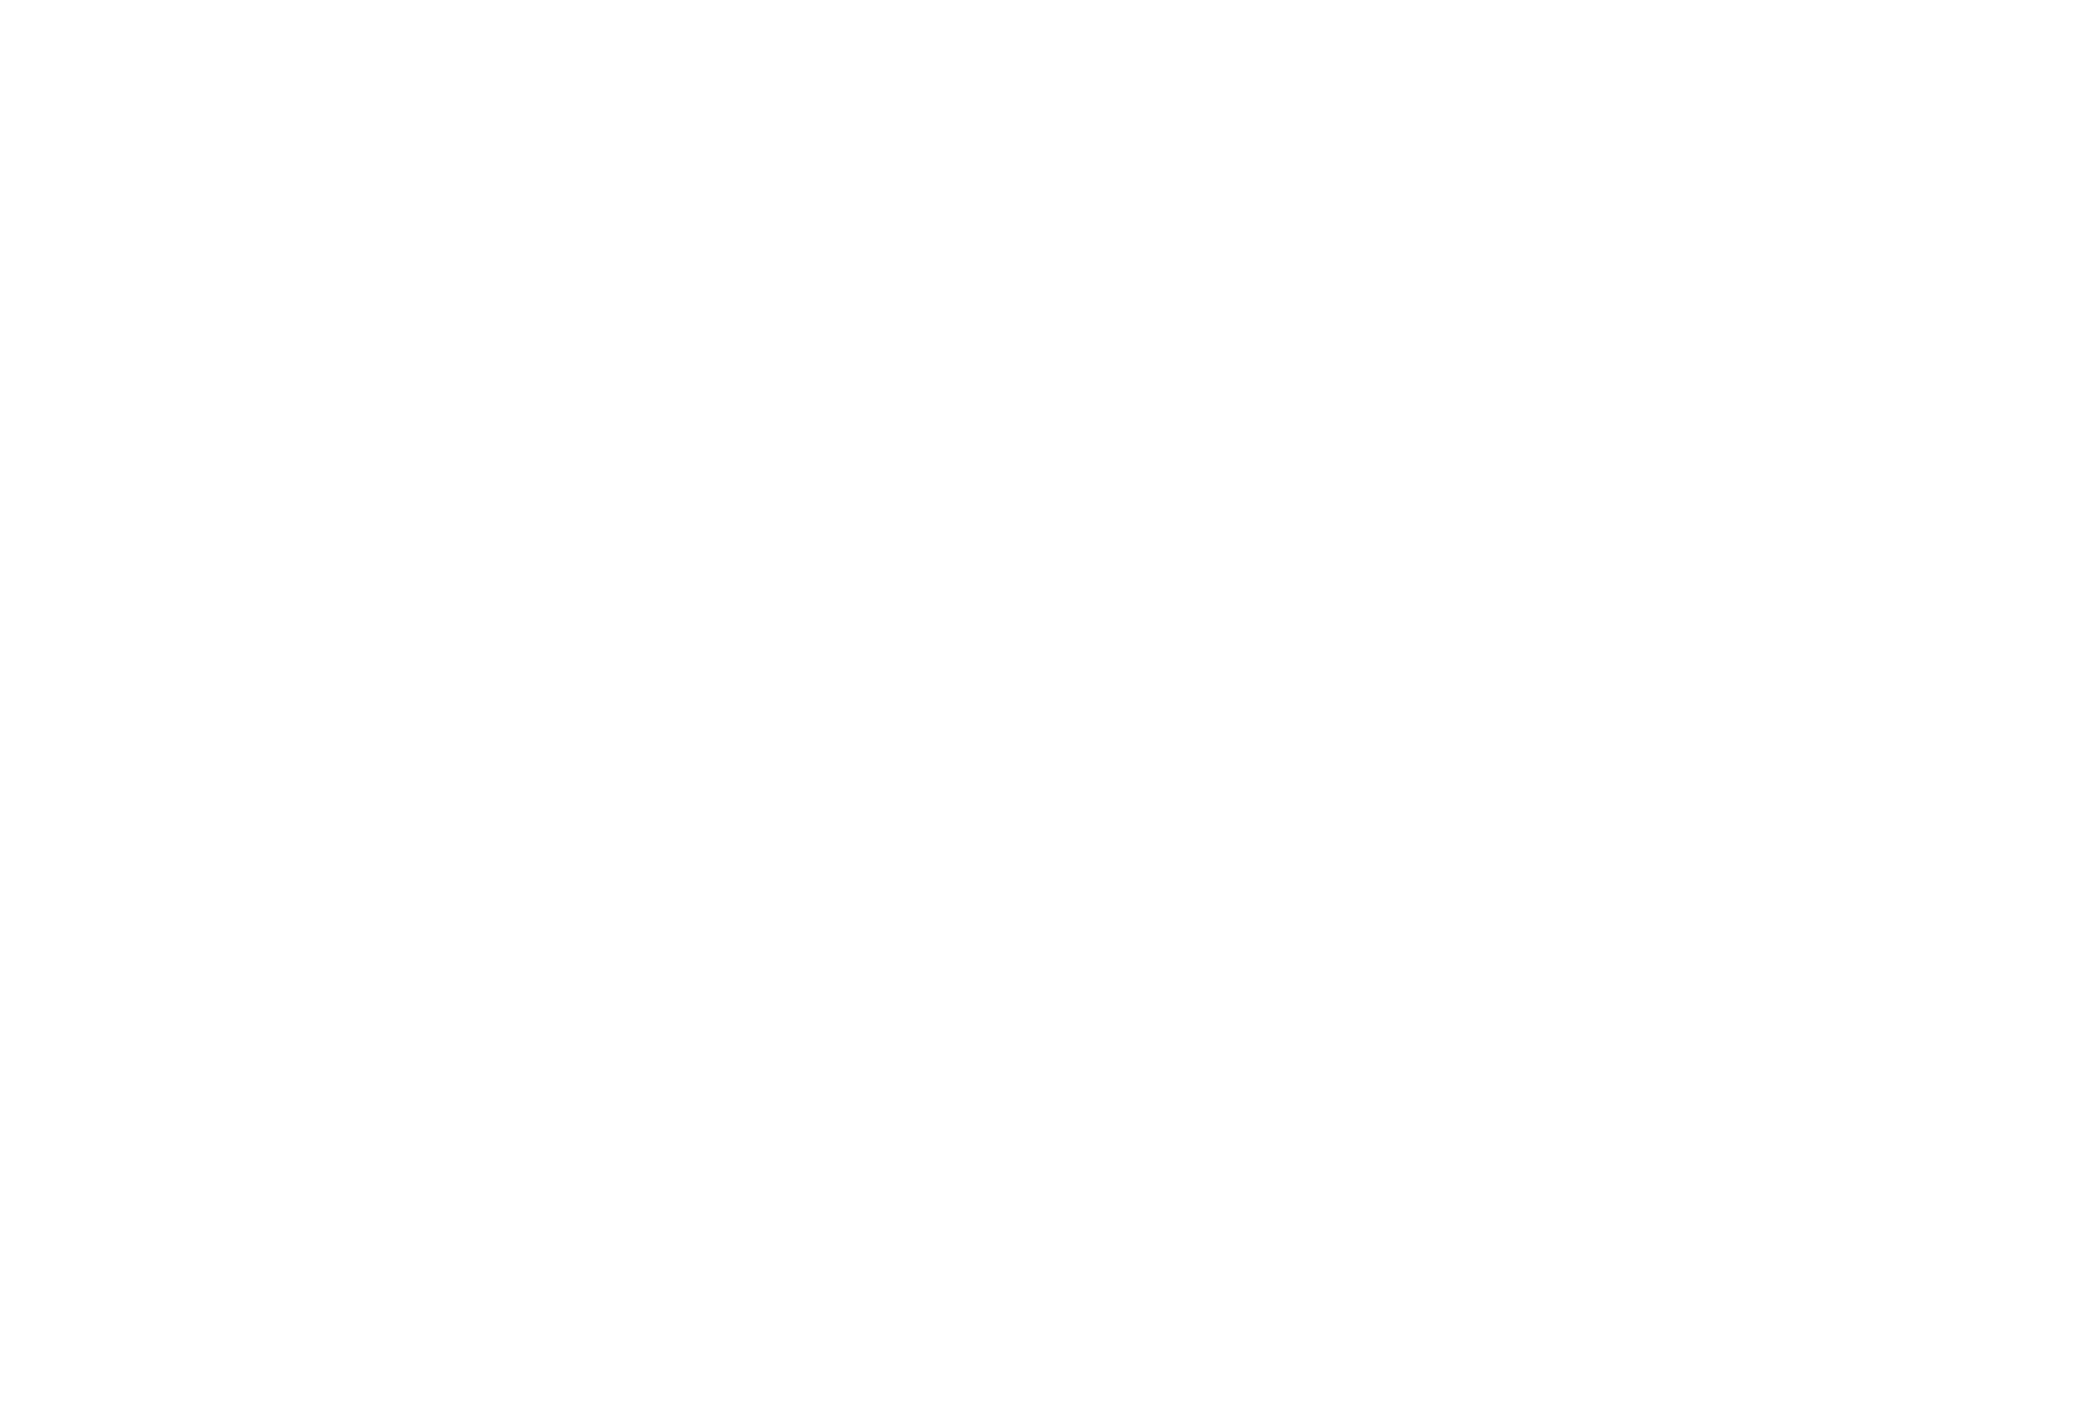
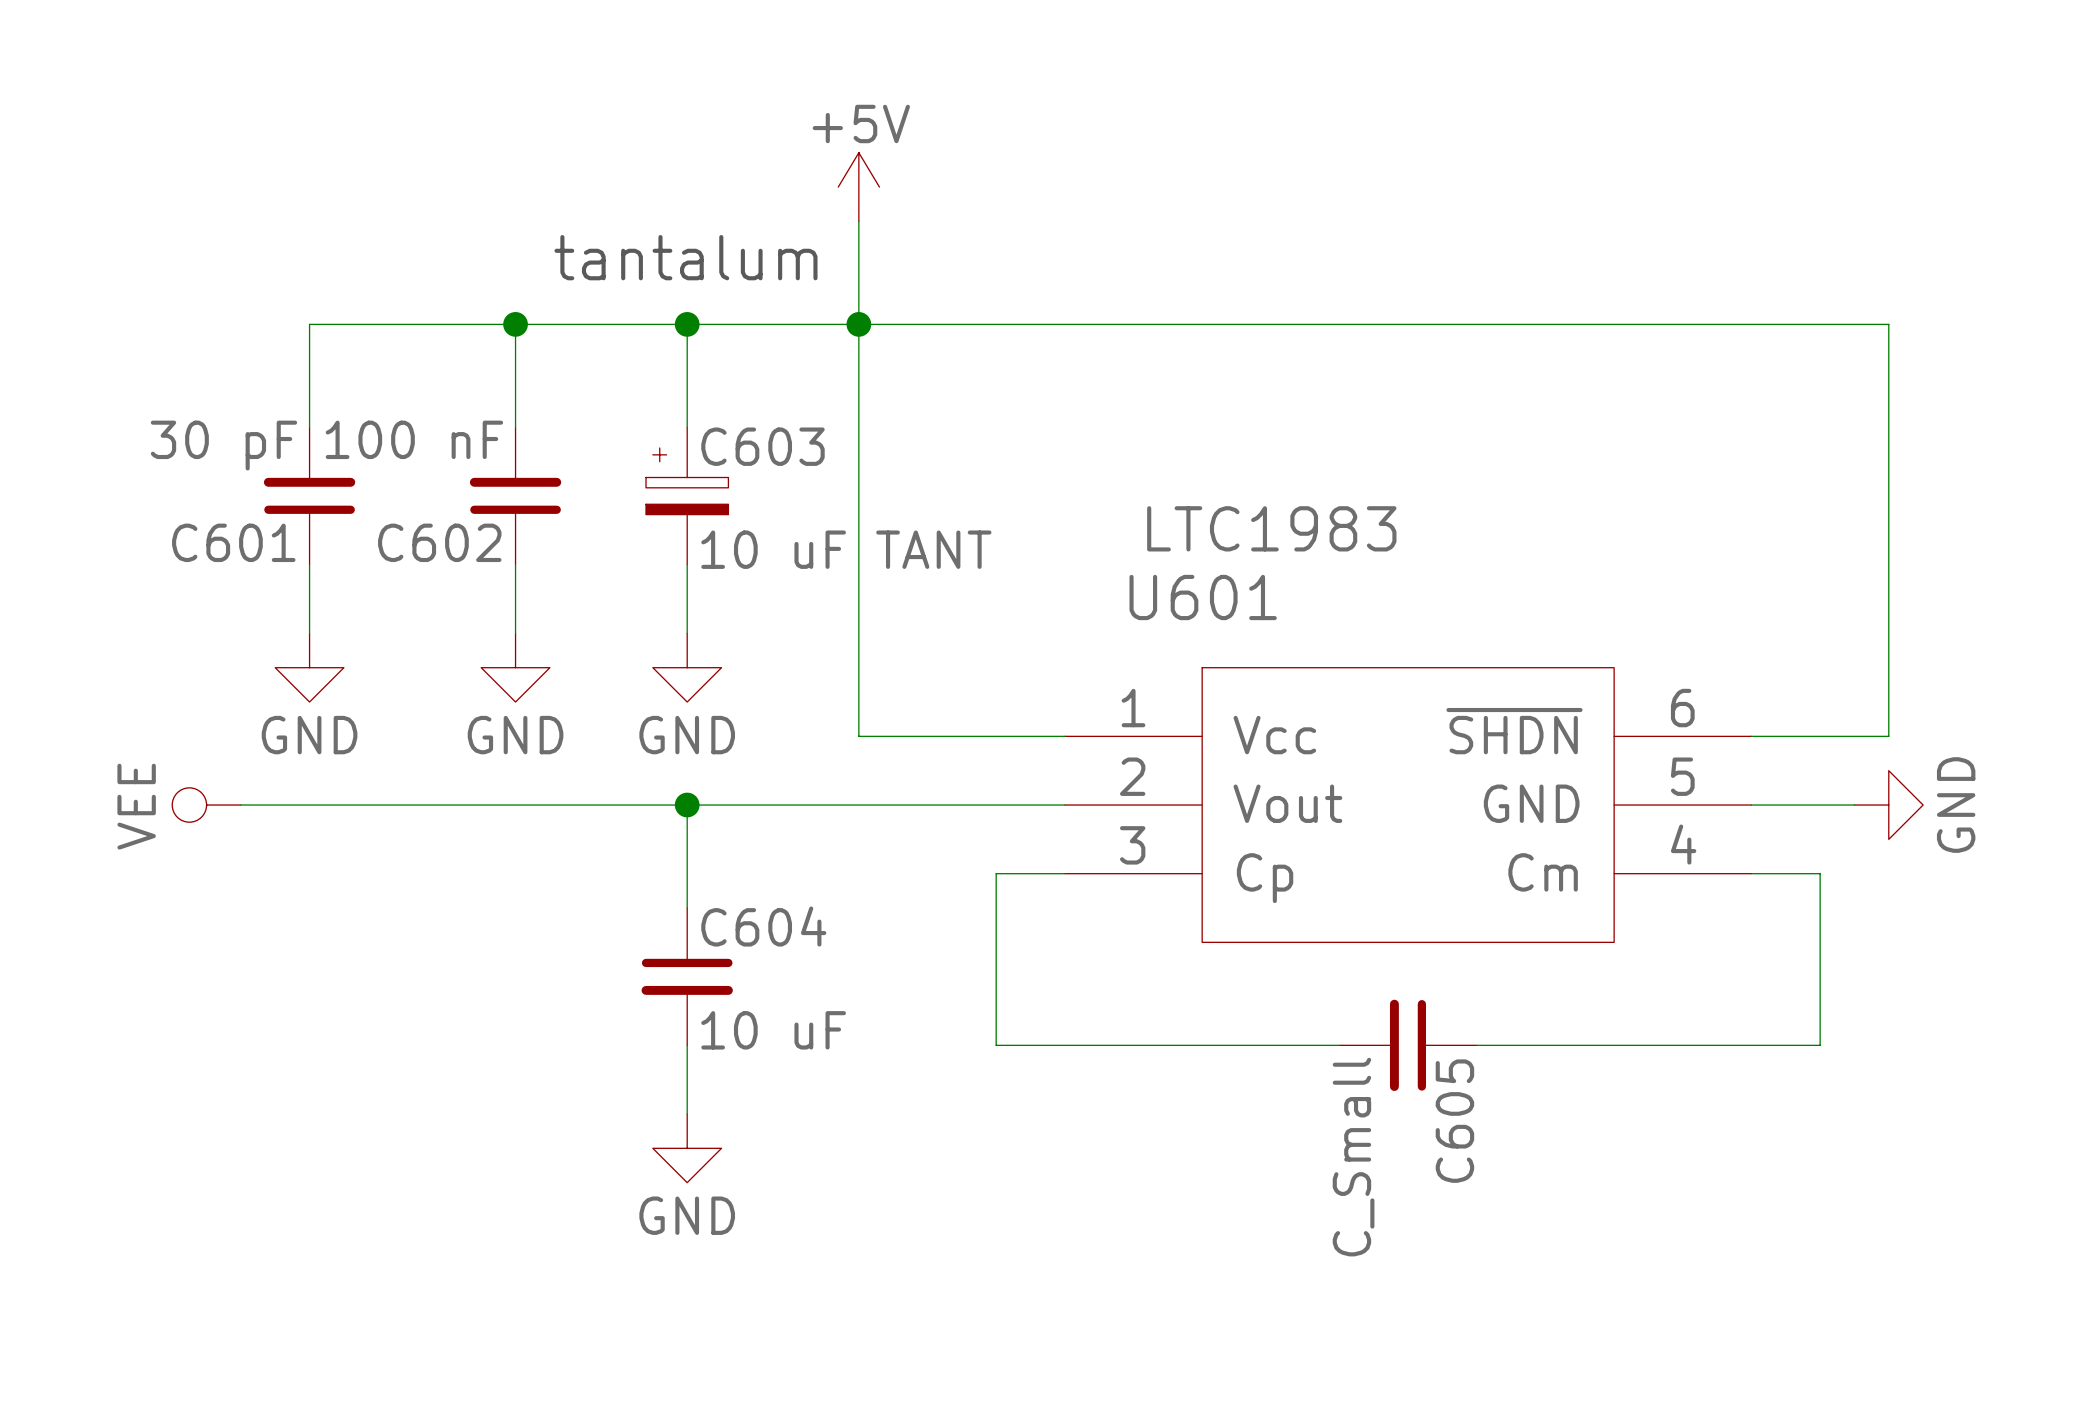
power symbol: none -> +5V (858, 187)
wire: none -> (858, 221) (858, 736) (1064, 736)
text: none -> tantalum (685, 257)
wire: none -> (515, 324) (515, 427)
junction: none -> (515, 324)
wire: none -> (687, 324) (687, 427)
junction: none -> (687, 324)
junction: none -> (858, 324)
wire: none -> (309, 427) (309, 324) (1888, 324) (1888, 736) (1751, 736)
C601: none -> 30 pF (309, 496)
C602: none -> 100 nF (515, 496)
C603: none -> 10 uF TANT (687, 496)
wire: none -> (309, 564) (309, 633)
wire: none -> (515, 564) (515, 633)
wire: none -> (687, 564) (687, 633)
power symbol: none -> GND (309, 667)
power symbol: none -> GND (515, 667)
power symbol: none -> GND (687, 667)
power symbol: none -> VEE (206, 805)
wire: none -> (240, 805) (1064, 805)
wire: none -> (687, 805) (687, 908)
junction: none -> (687, 805)
U601: none -> LTC1983 (1408, 805)
wire: none -> (1751, 805) (1854, 805)
power symbol: none -> GND (1888, 805)
wire: none -> (1064, 873) (996, 873) (996, 1045) (1339, 1045)
wire: none -> (1751, 873) (1820, 873) (1820, 1045) (1476, 1045)
C604: none -> 10 uF (687, 976)
wire: none -> (687, 1045) (687, 1114)
C605: none -> C_Small (1408, 1045)
power symbol: none -> GND (687, 1148)

